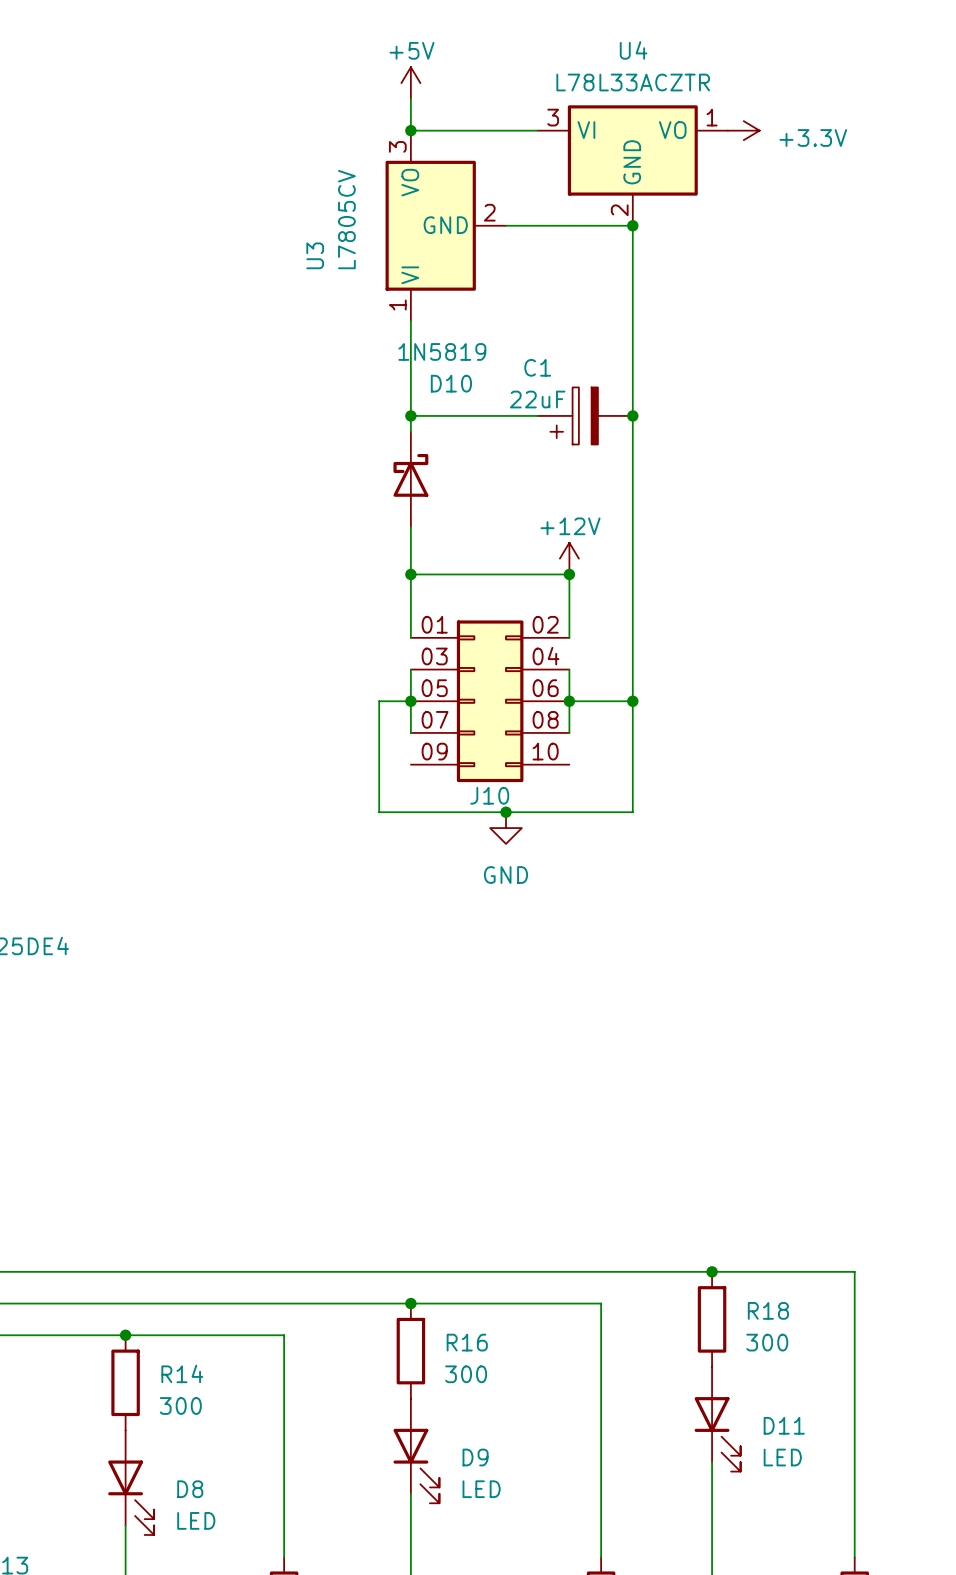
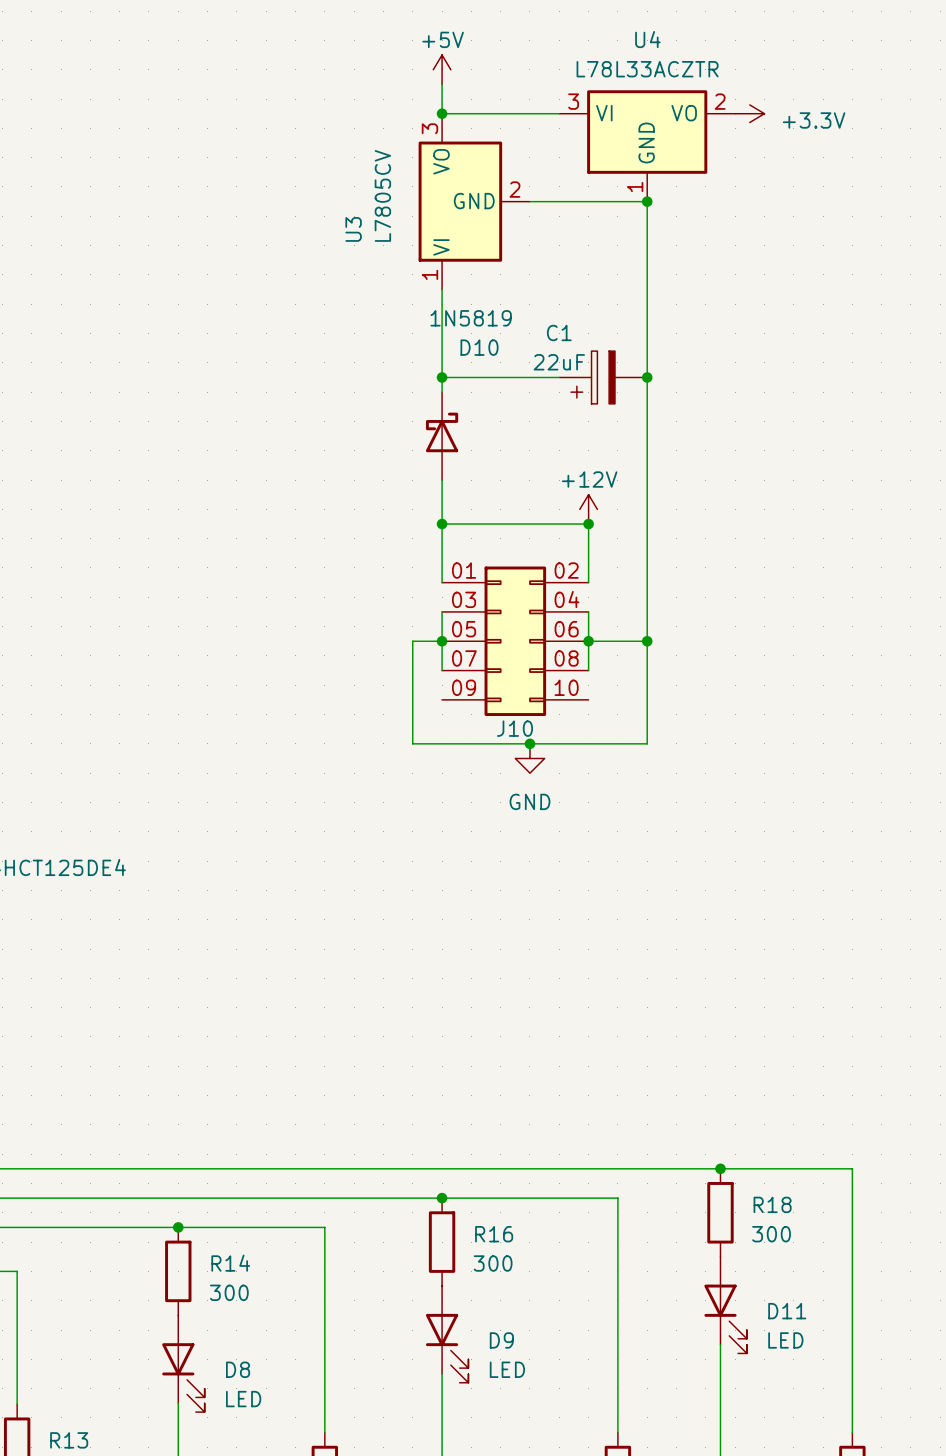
U4 pin number: 1 (712, 117) -> 2 (720, 101)
U4 pin number: 2 (619, 210) -> 1 (635, 186)

